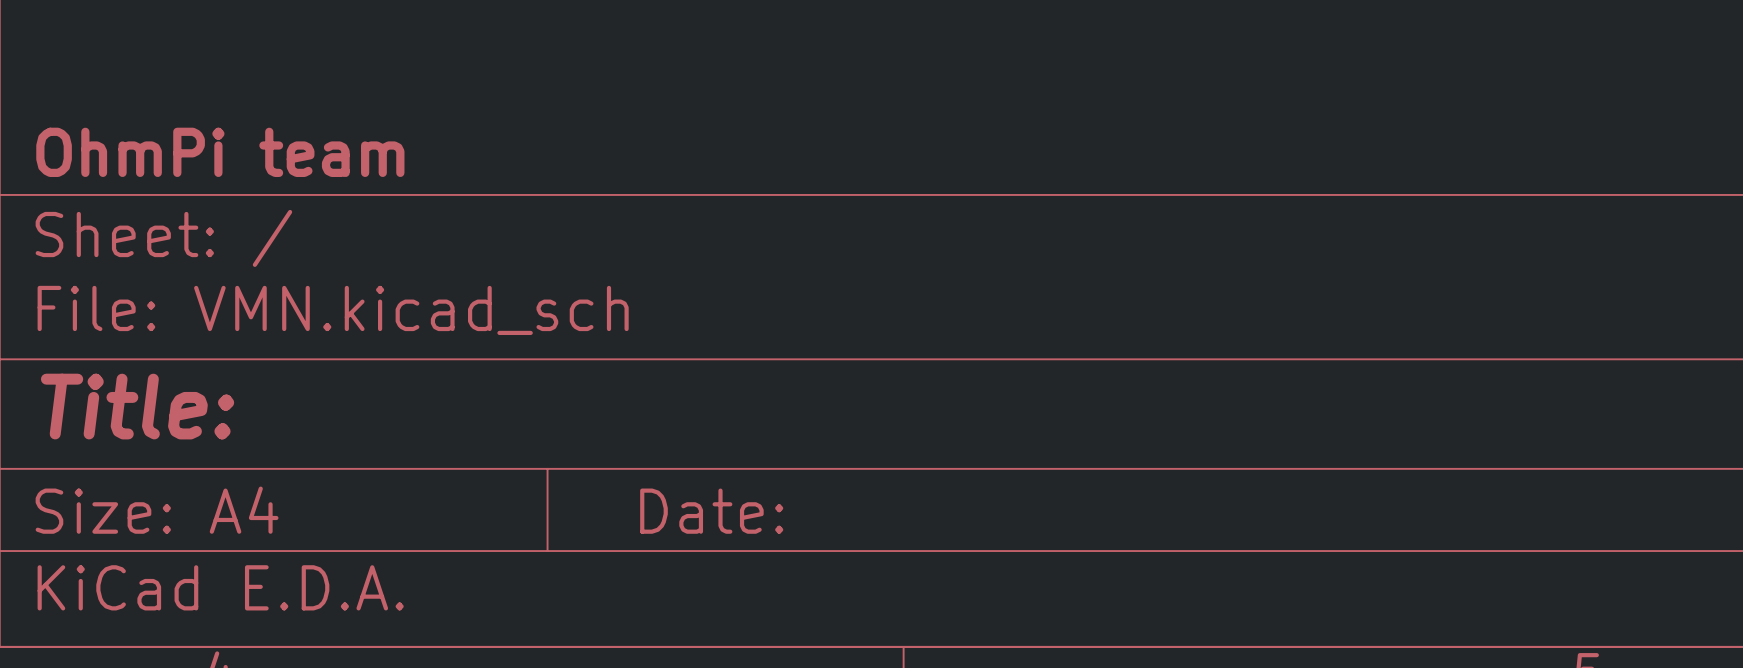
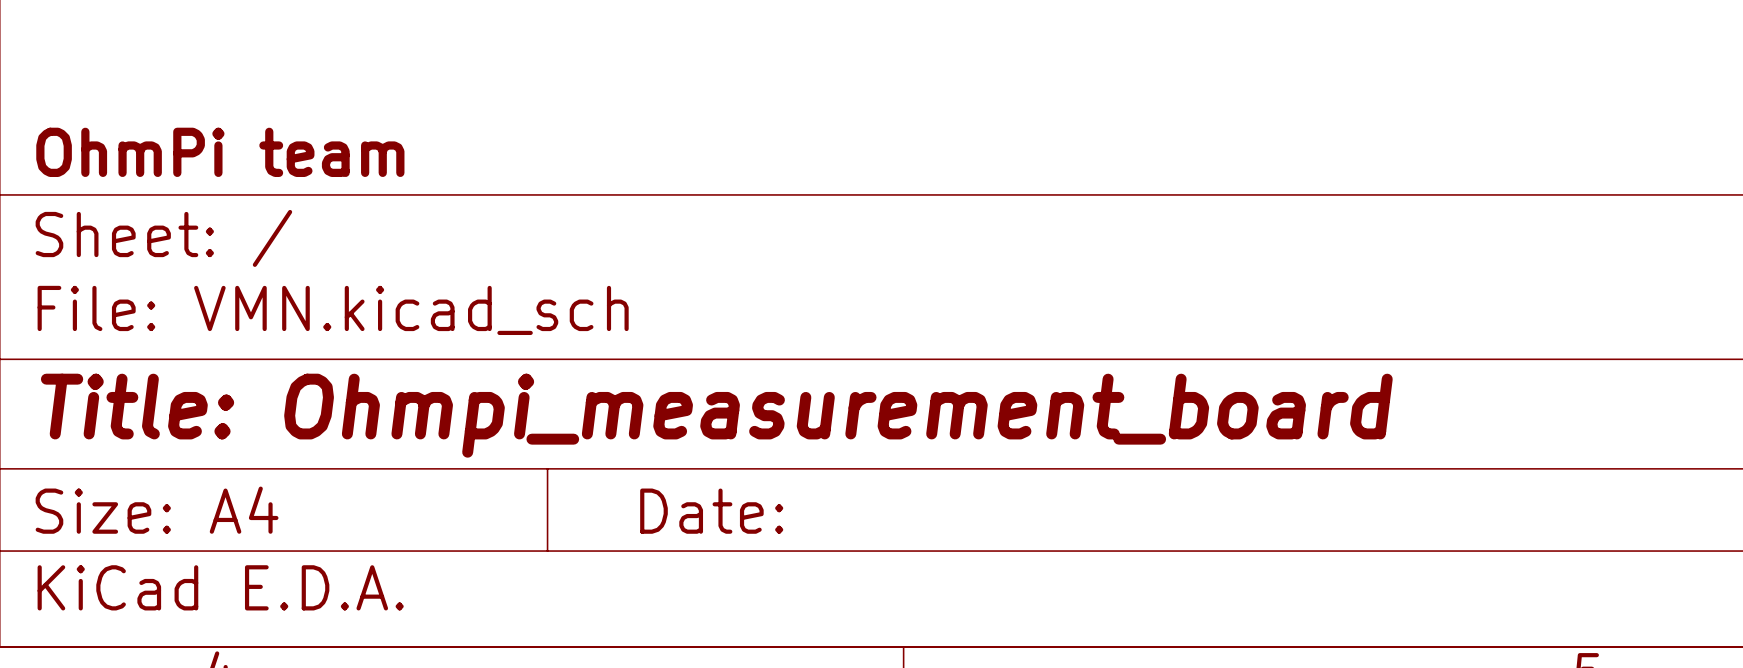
title block: Title: (137, 406) -> Title: Ohmpi_measurement_board (716, 415)

